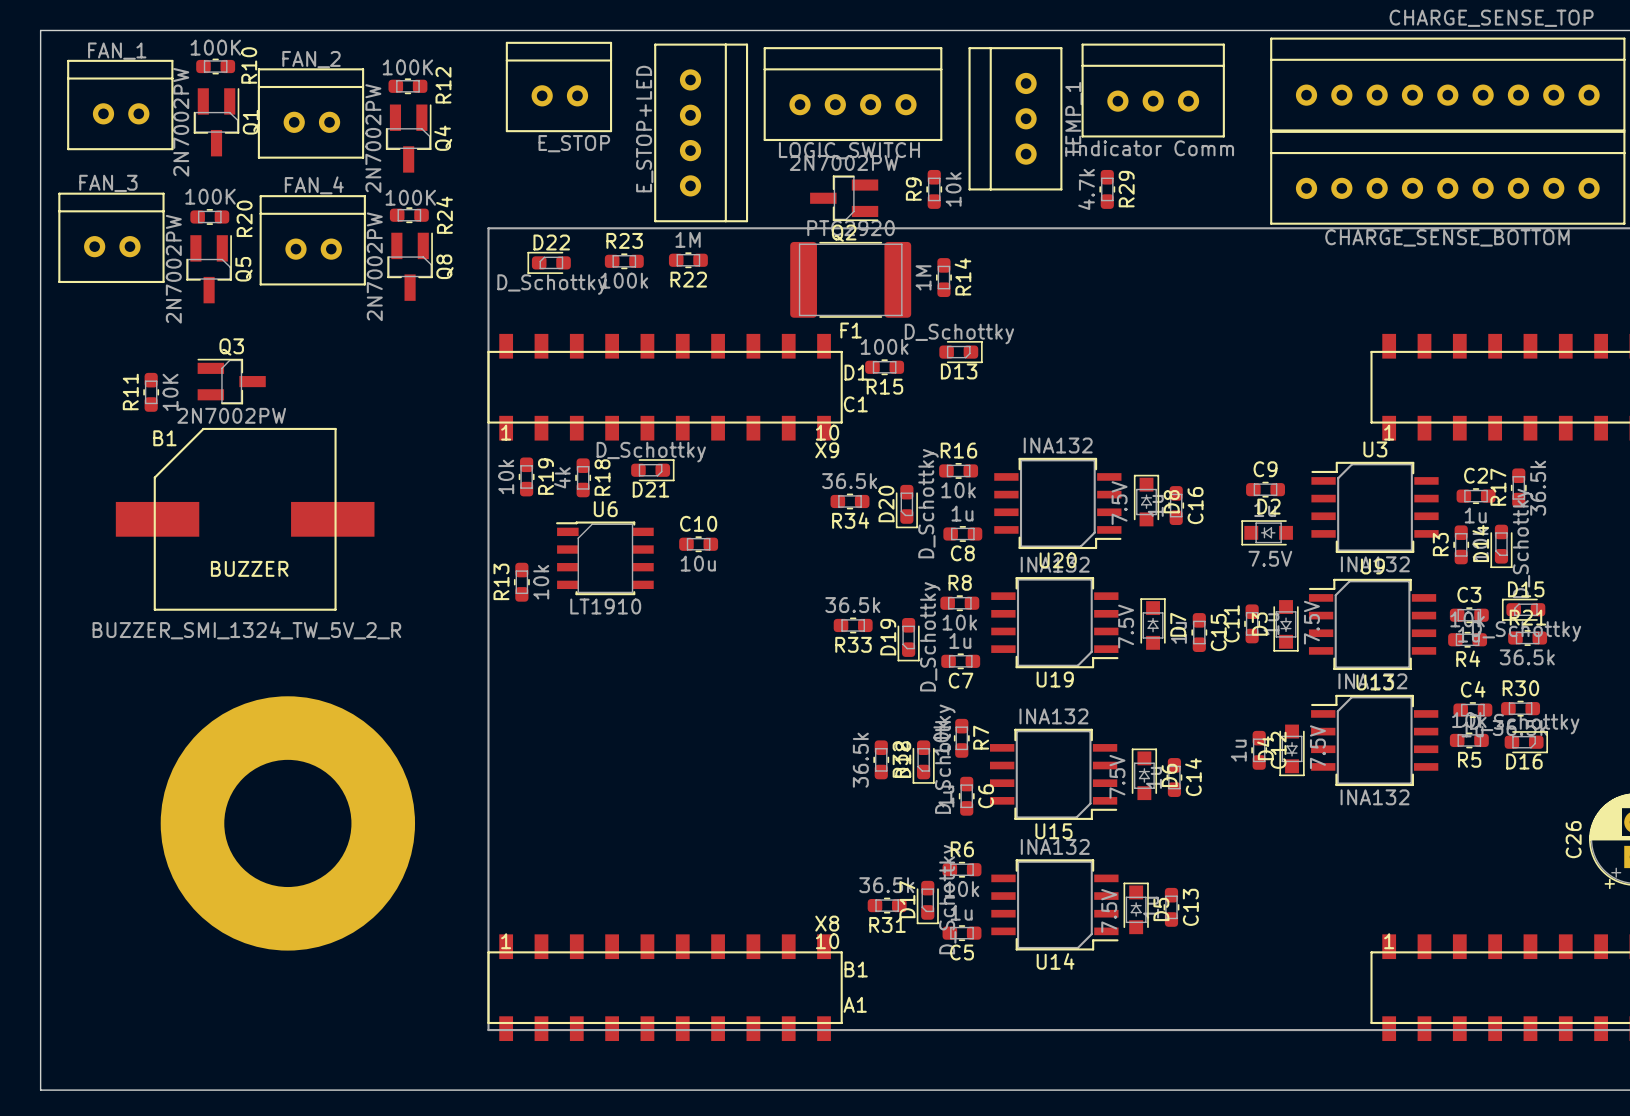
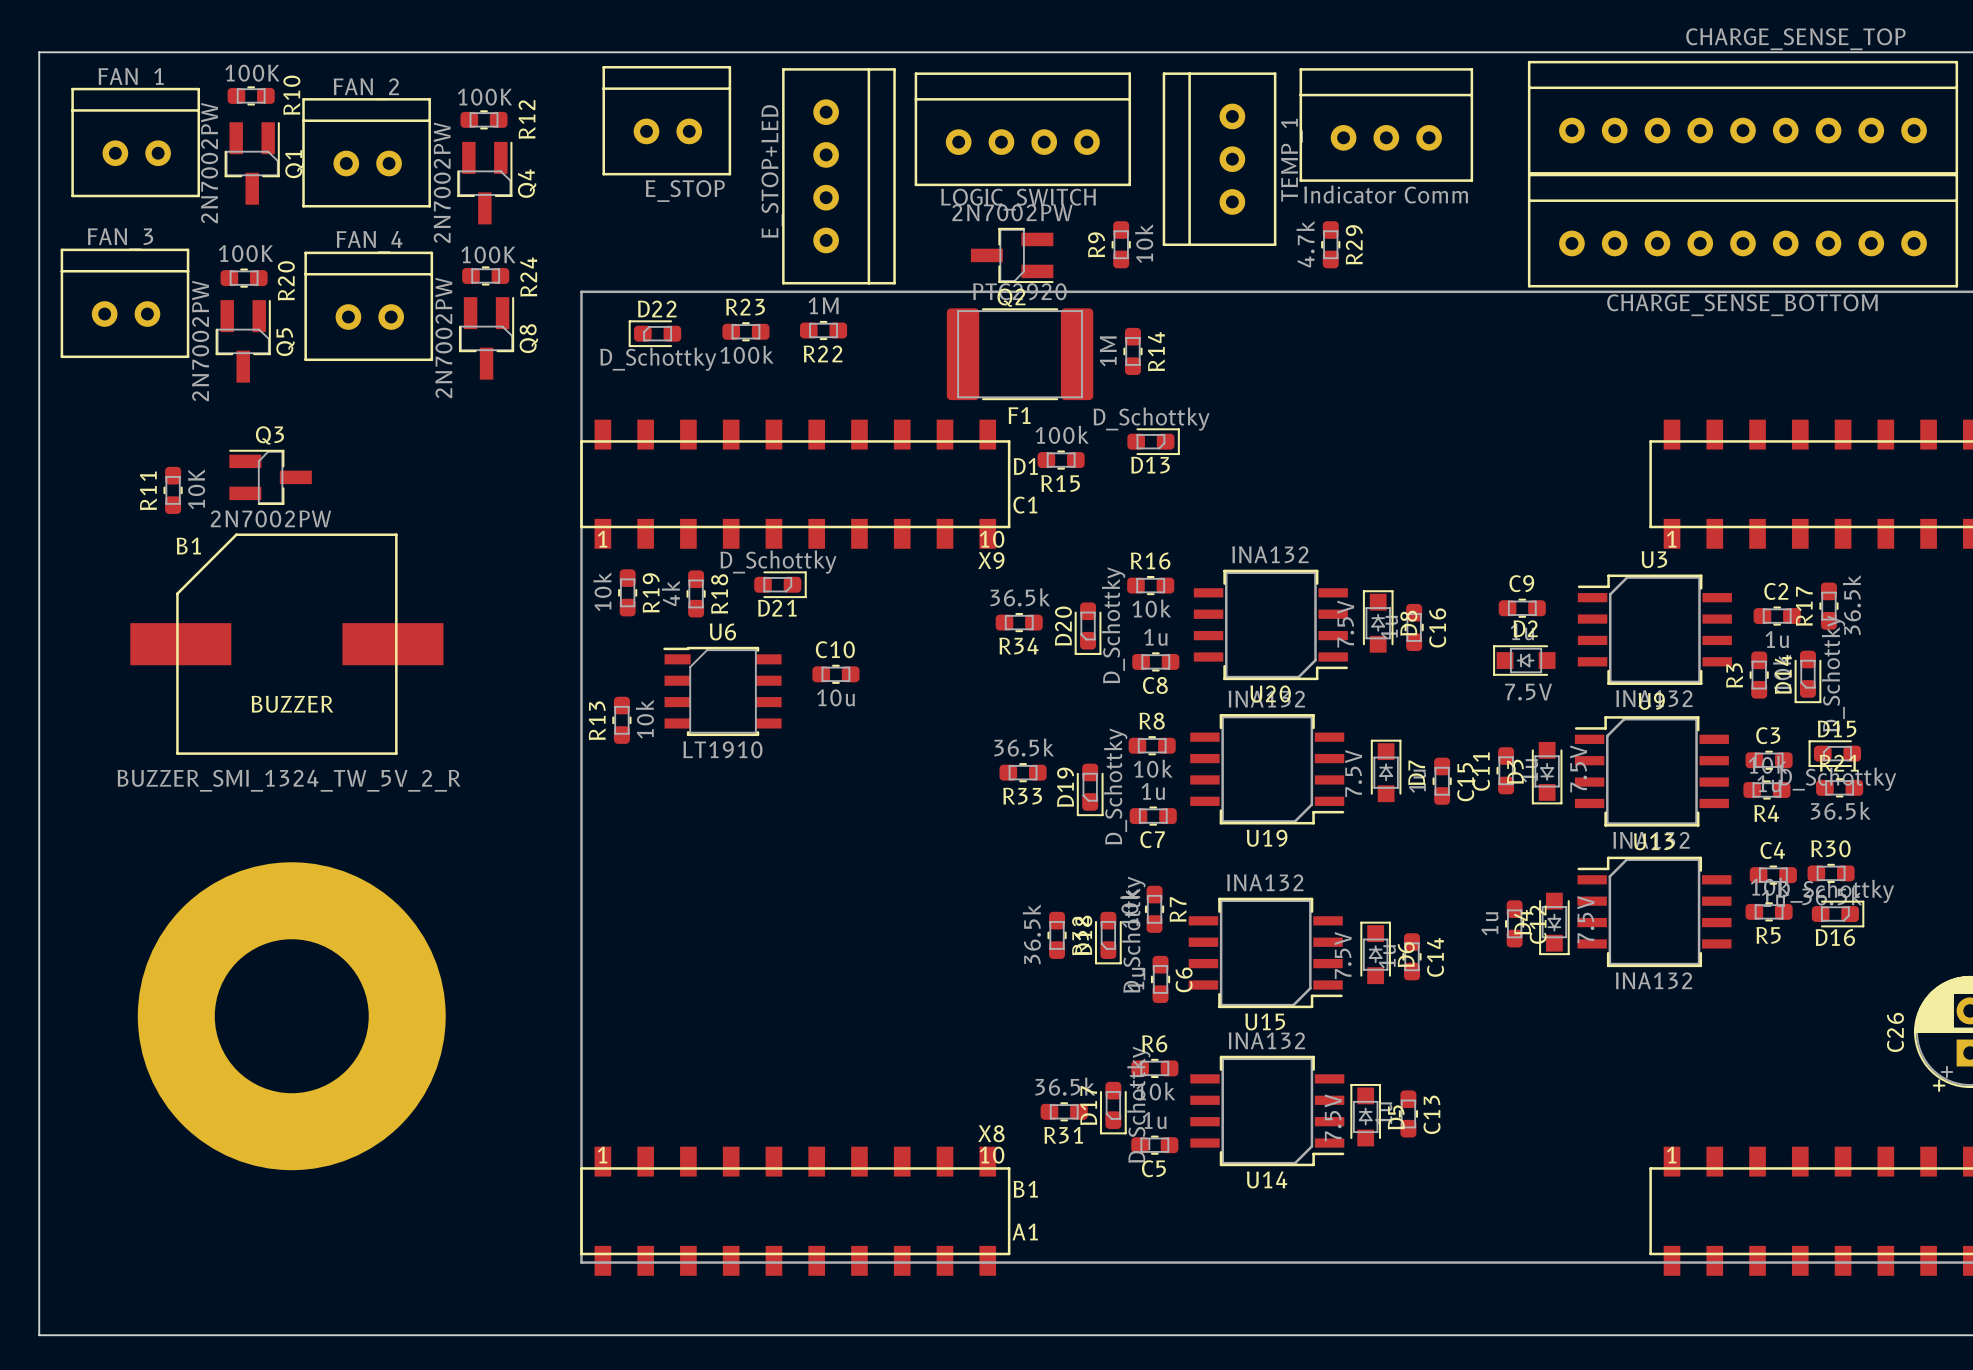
part position: (287, 823) -> (291, 1016)

